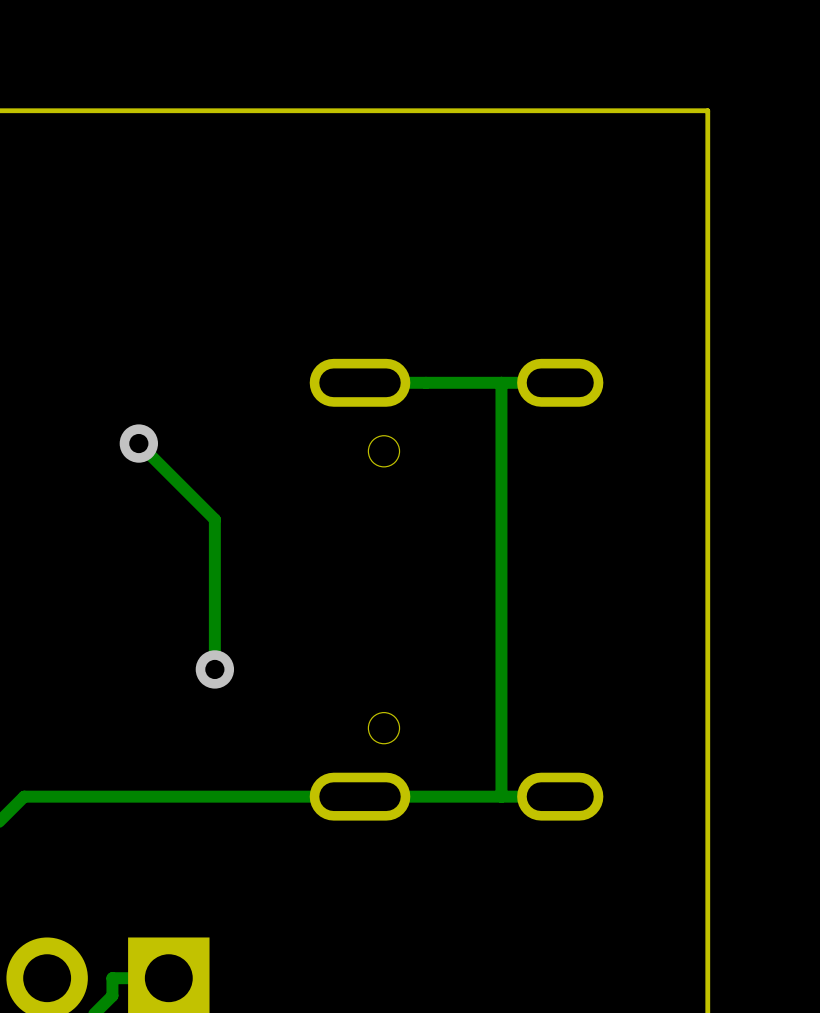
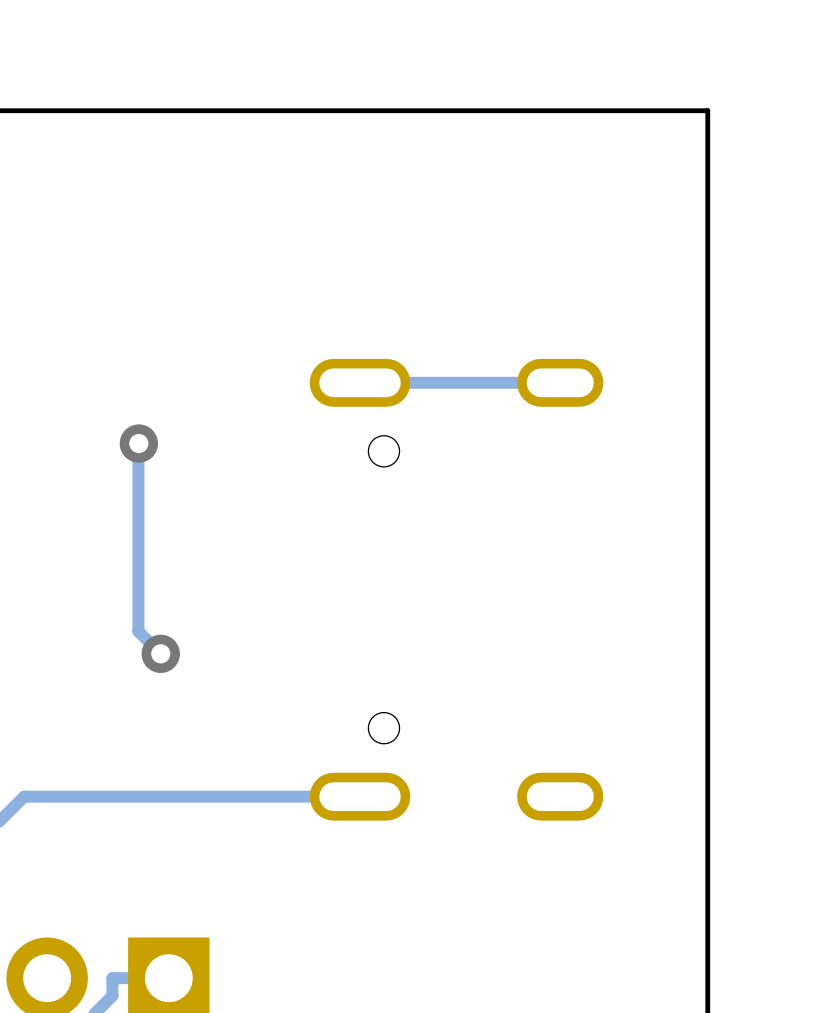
track: (501, 382) (501, 796) -> none
track: (138, 443) (214, 519) (214, 669) -> (138, 443) (138, 631) (160, 653)
via position: (214, 669) -> (160, 653)
track: (560, 796) (360, 796) -> none

